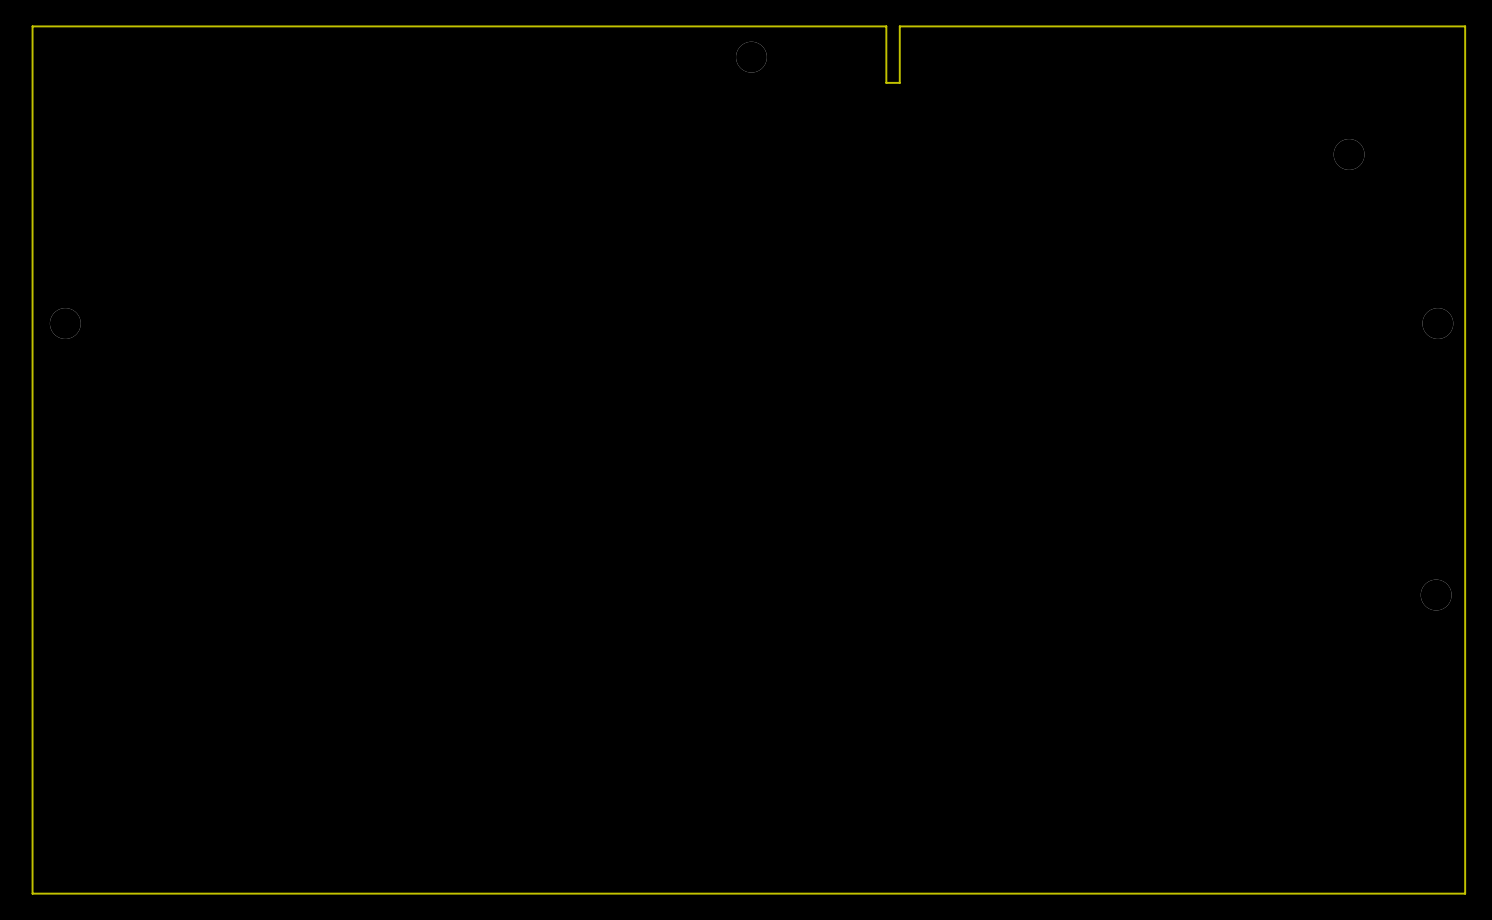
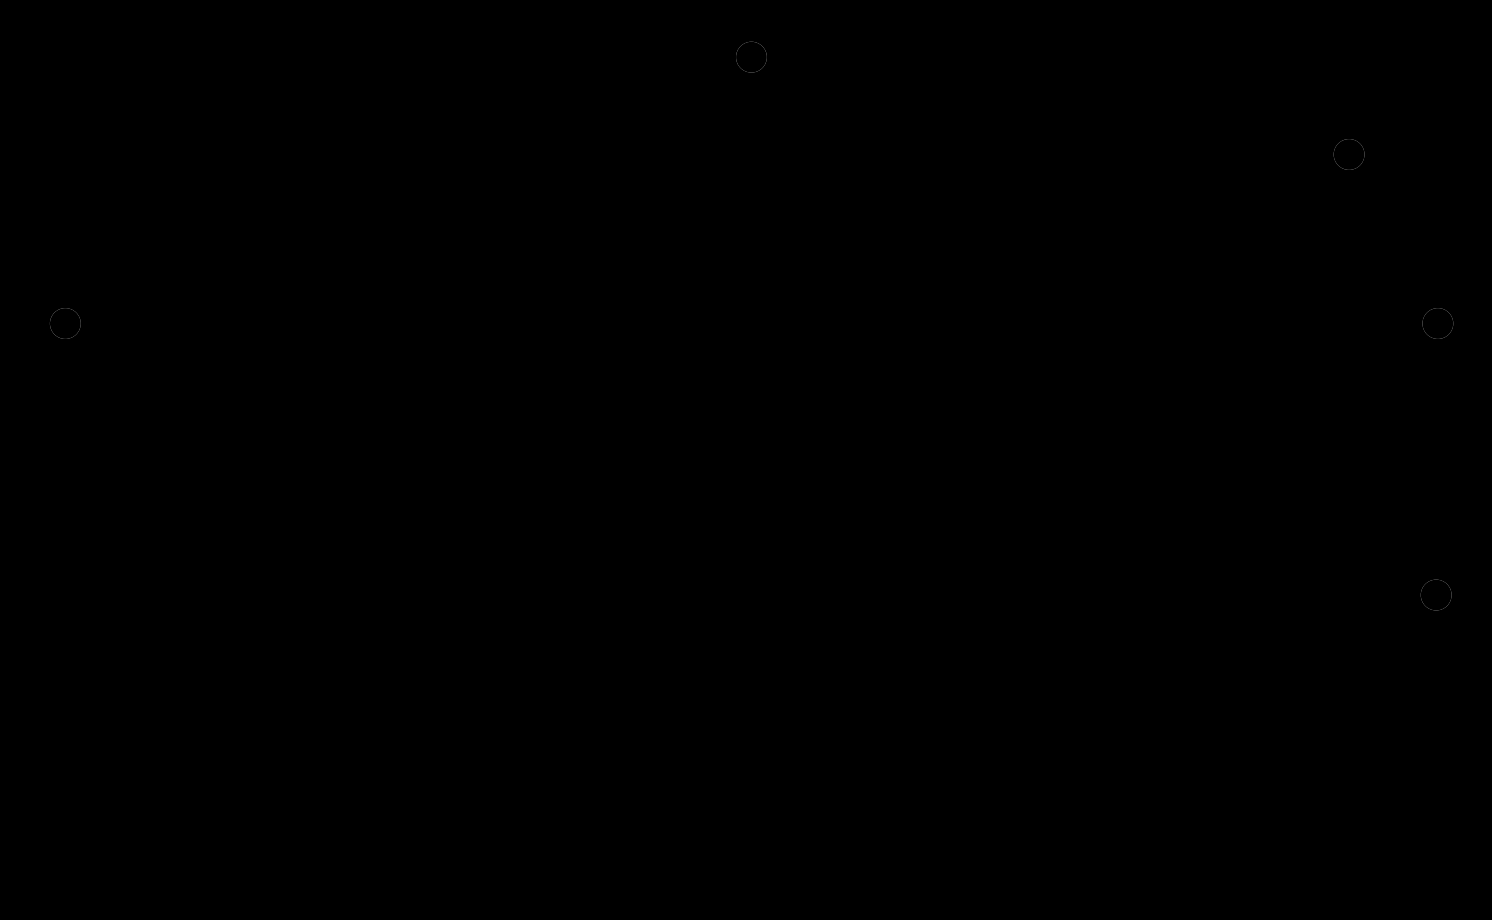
board edge: (32, 26) (886, 26) (886, 82) (899, 82) (899, 26) (1465, 26) (1465, 893) (32, 893) (32, 26) -> none

